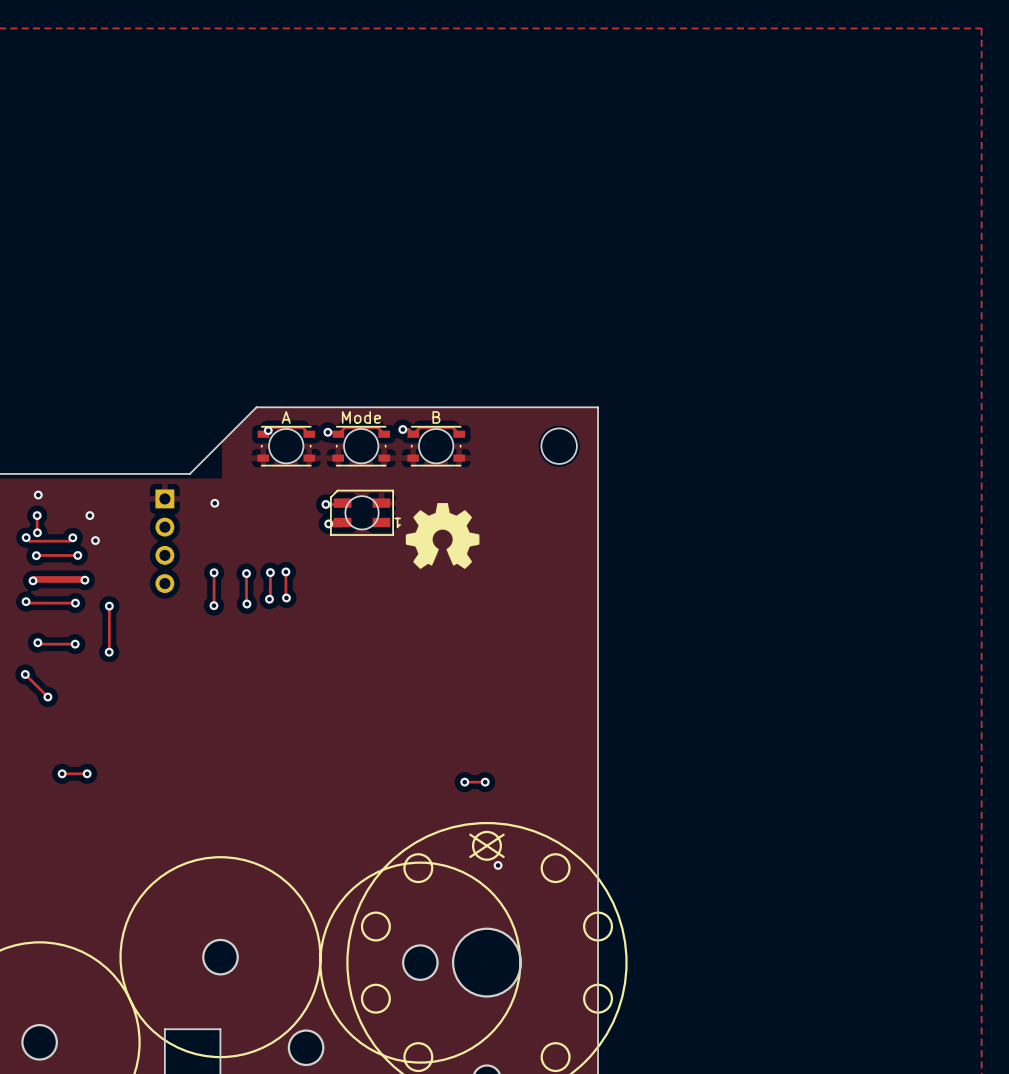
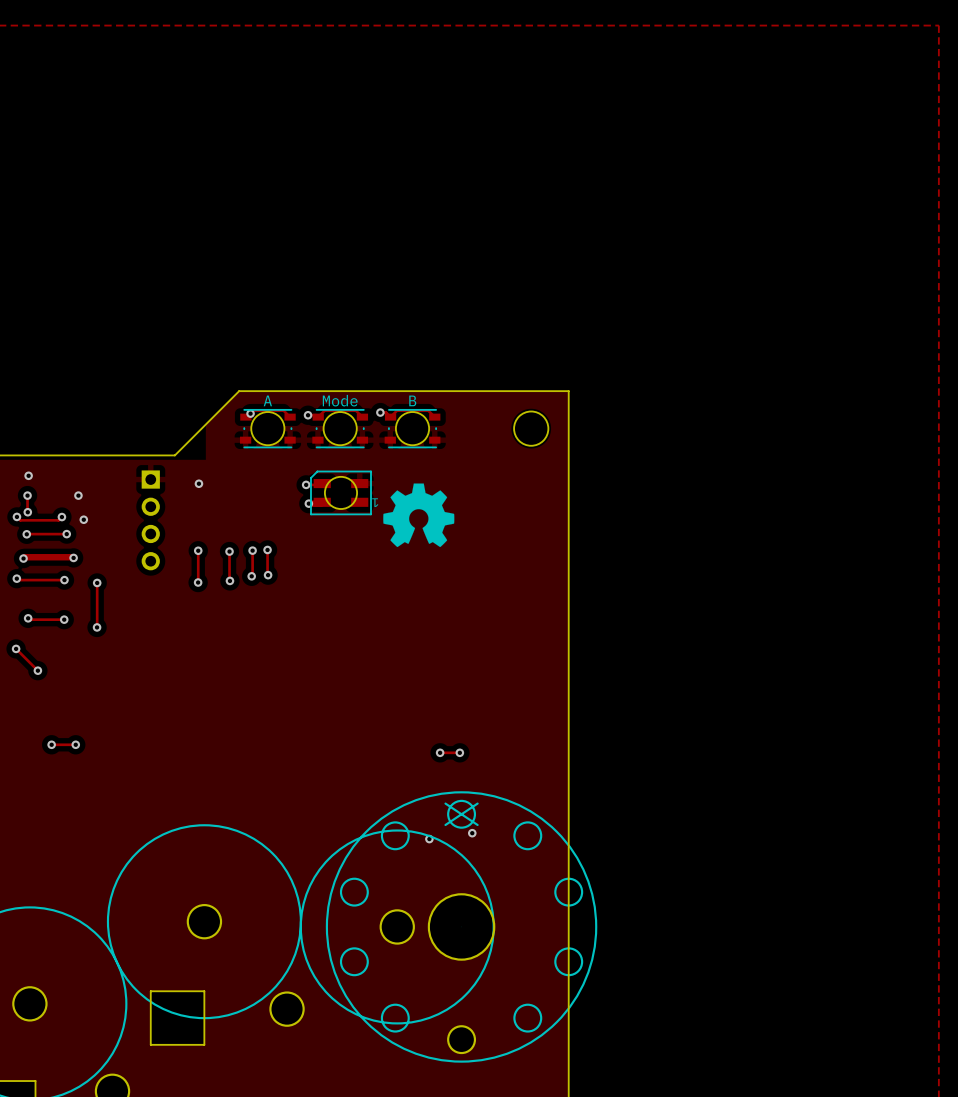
via: none -> (429, 839)

